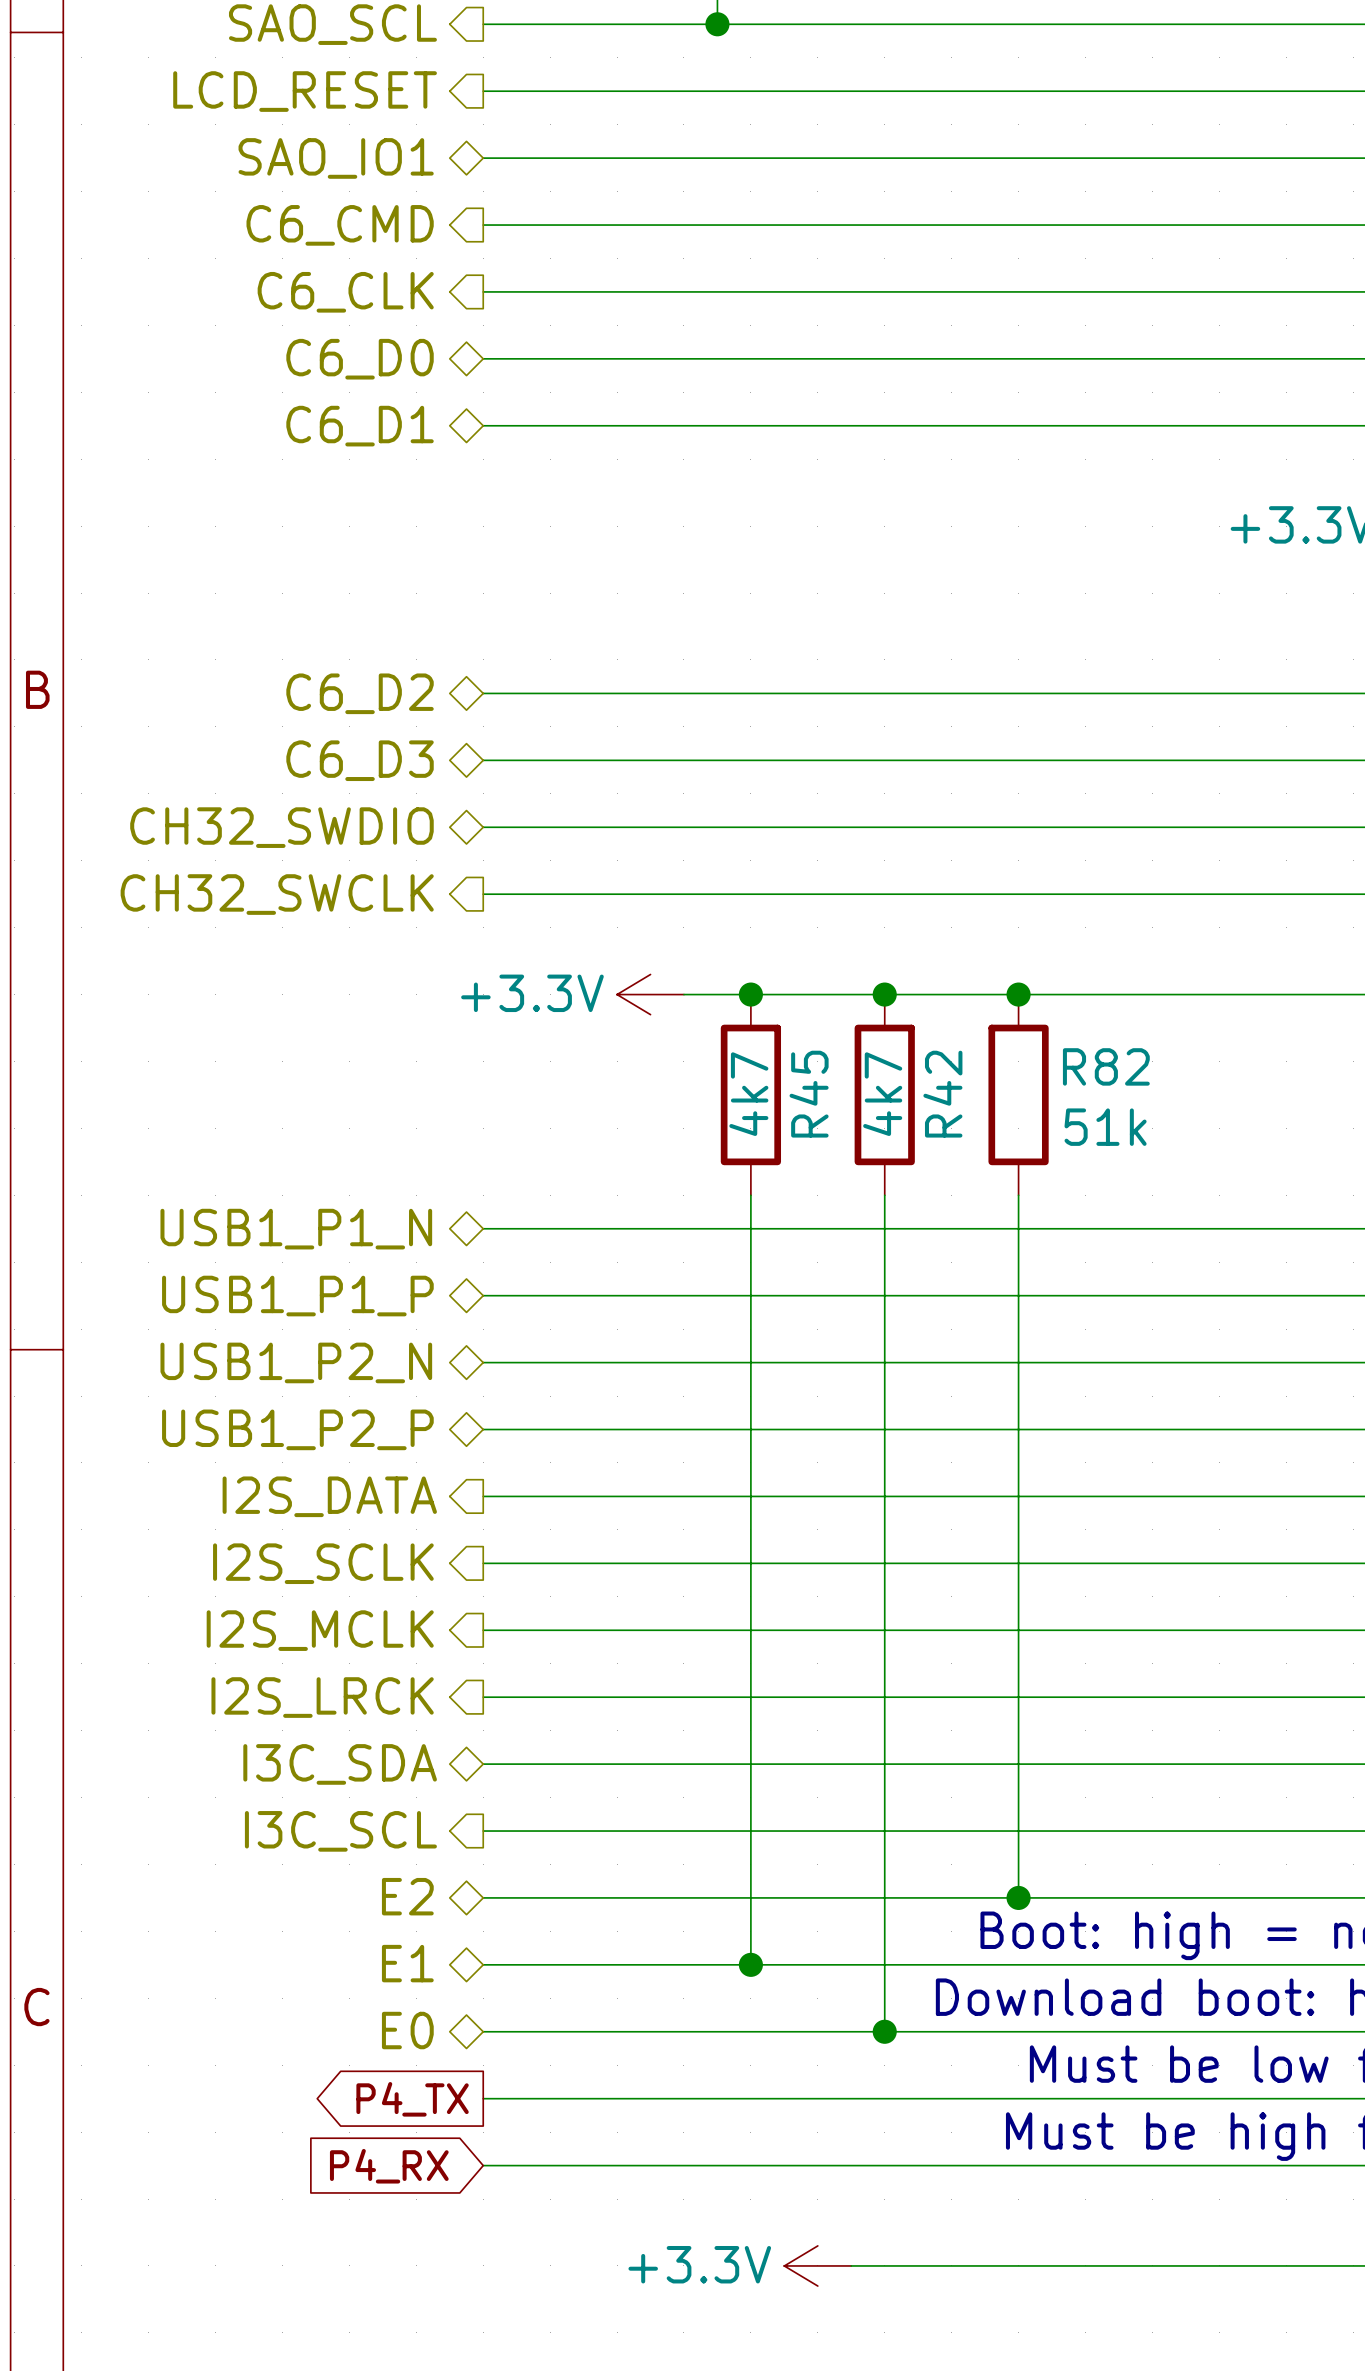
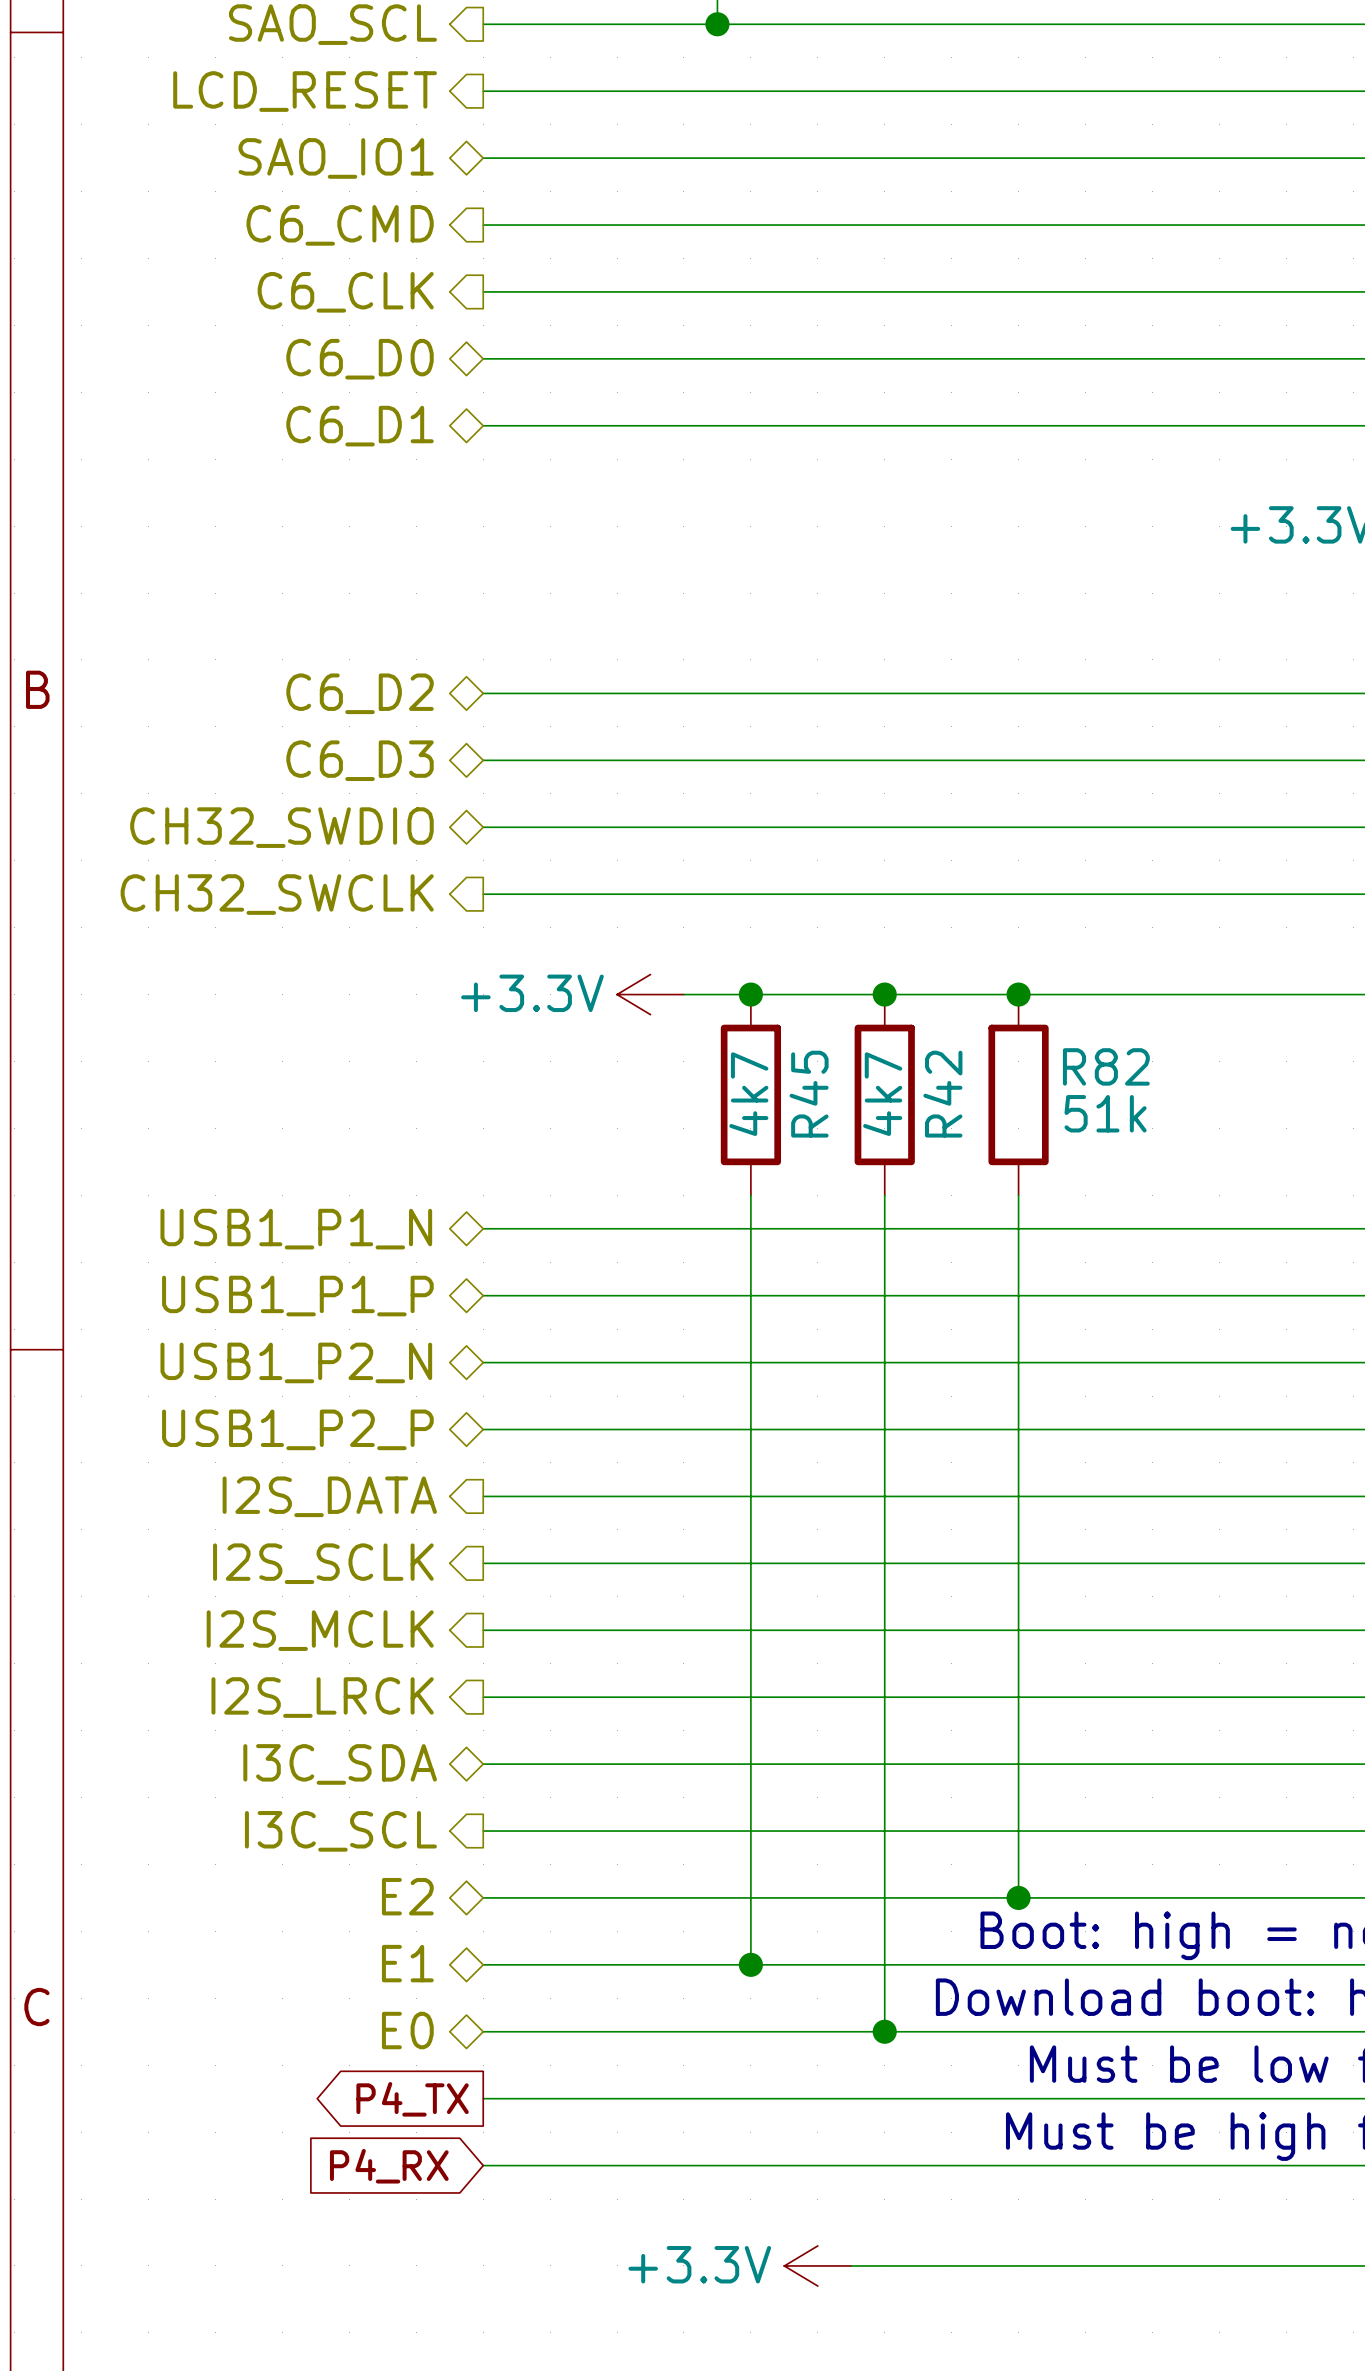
R82 value position: 51k (1105, 1127) -> 51k (1105, 1113)

